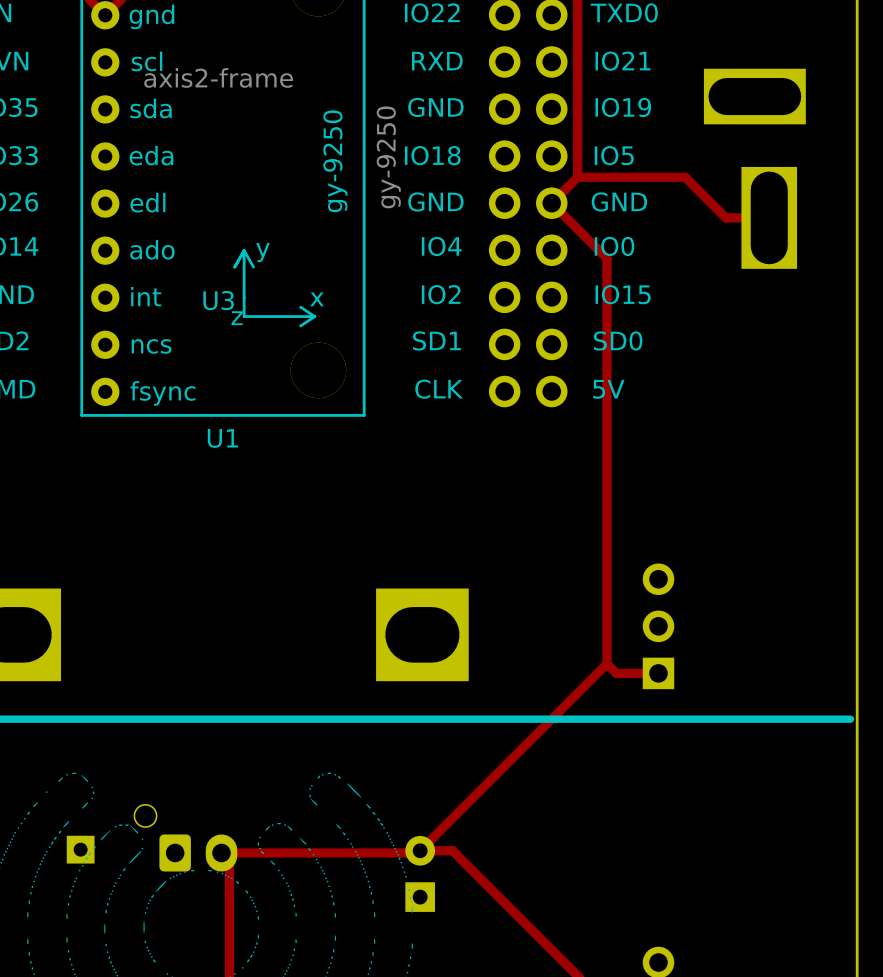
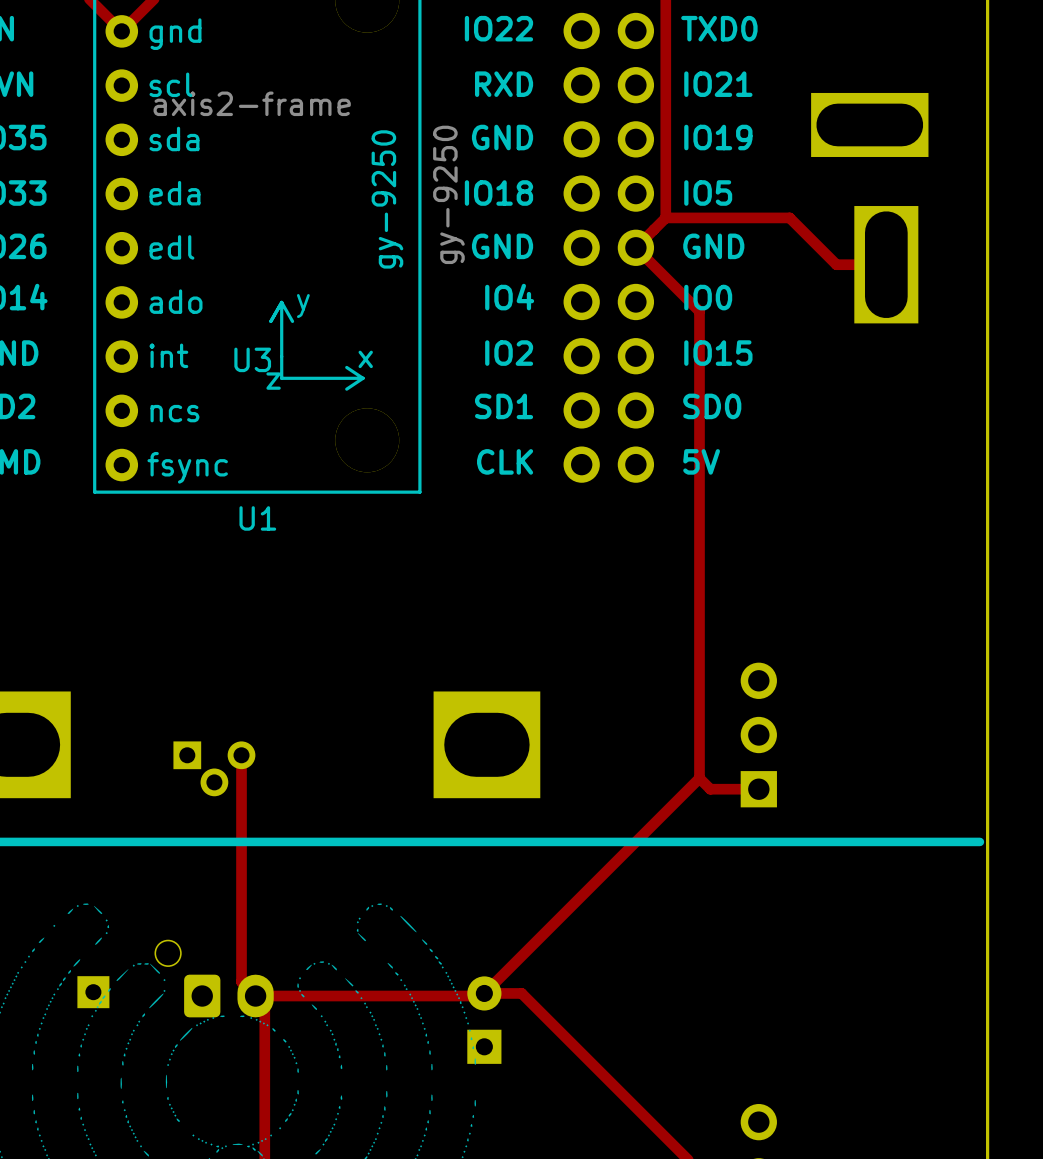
track: none -> (241, 755) (241, 981) (255, 996)
part: none -> (214, 768)

